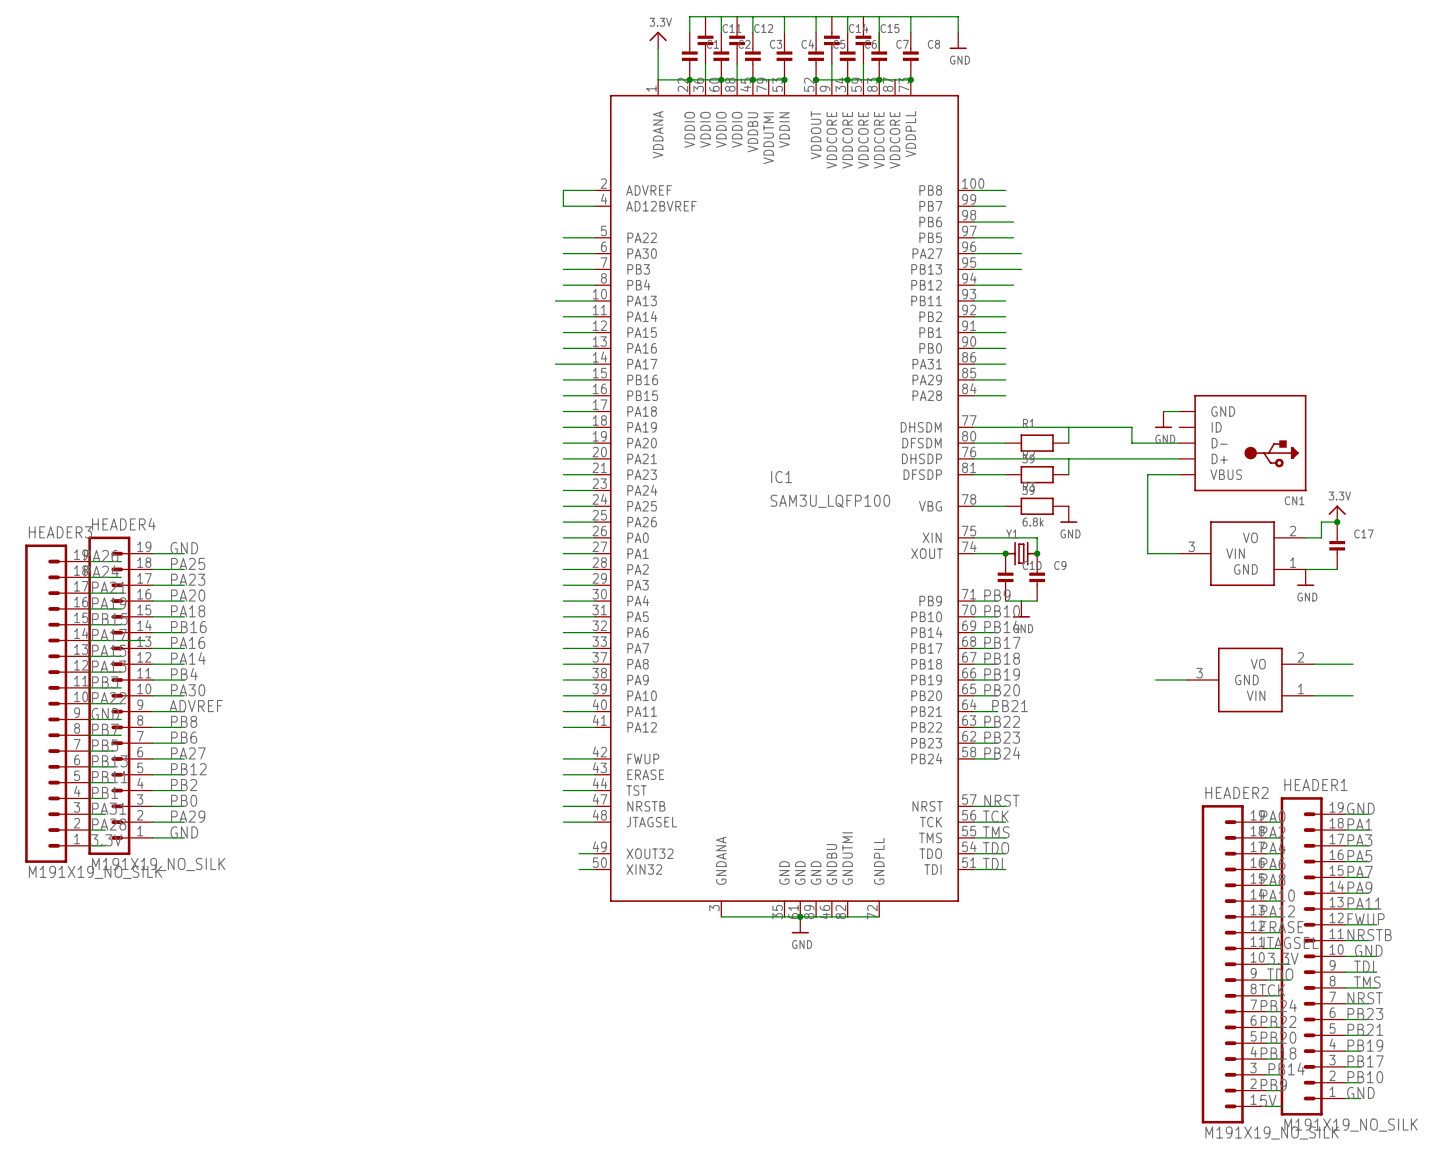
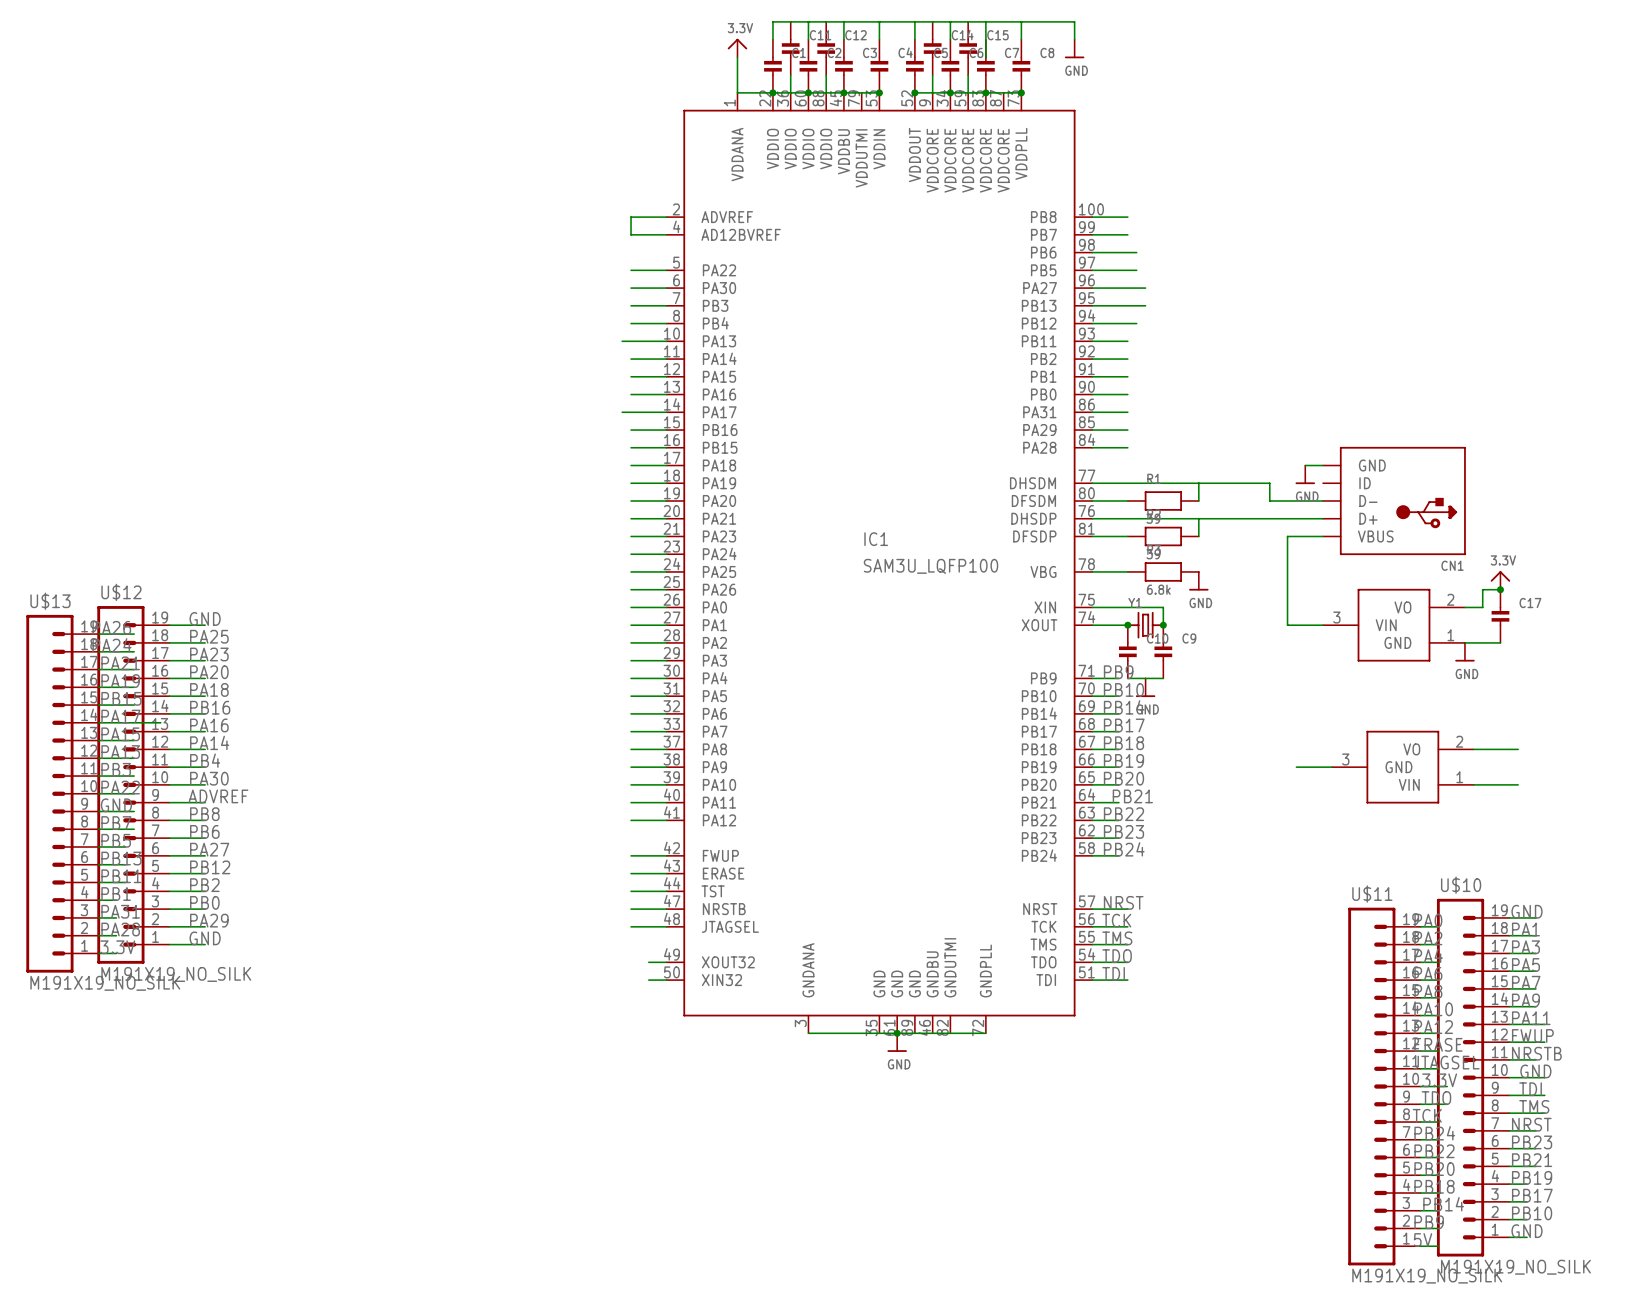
HEADER4 name: HEADER4 (123, 524) -> U$12 (121, 592)
HEADER3 name: HEADER3 (60, 532) -> U$13 (50, 601)
HEADER1 name: HEADER1 (1315, 785) -> U$10 (1461, 885)
HEADER2 name: HEADER2 (1236, 792) -> U$11 (1372, 894)

